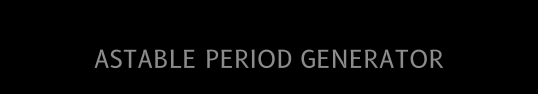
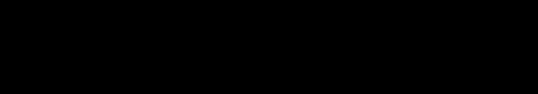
text: ASTABLE PERIOD GENERATOR (268, 58) -> none

